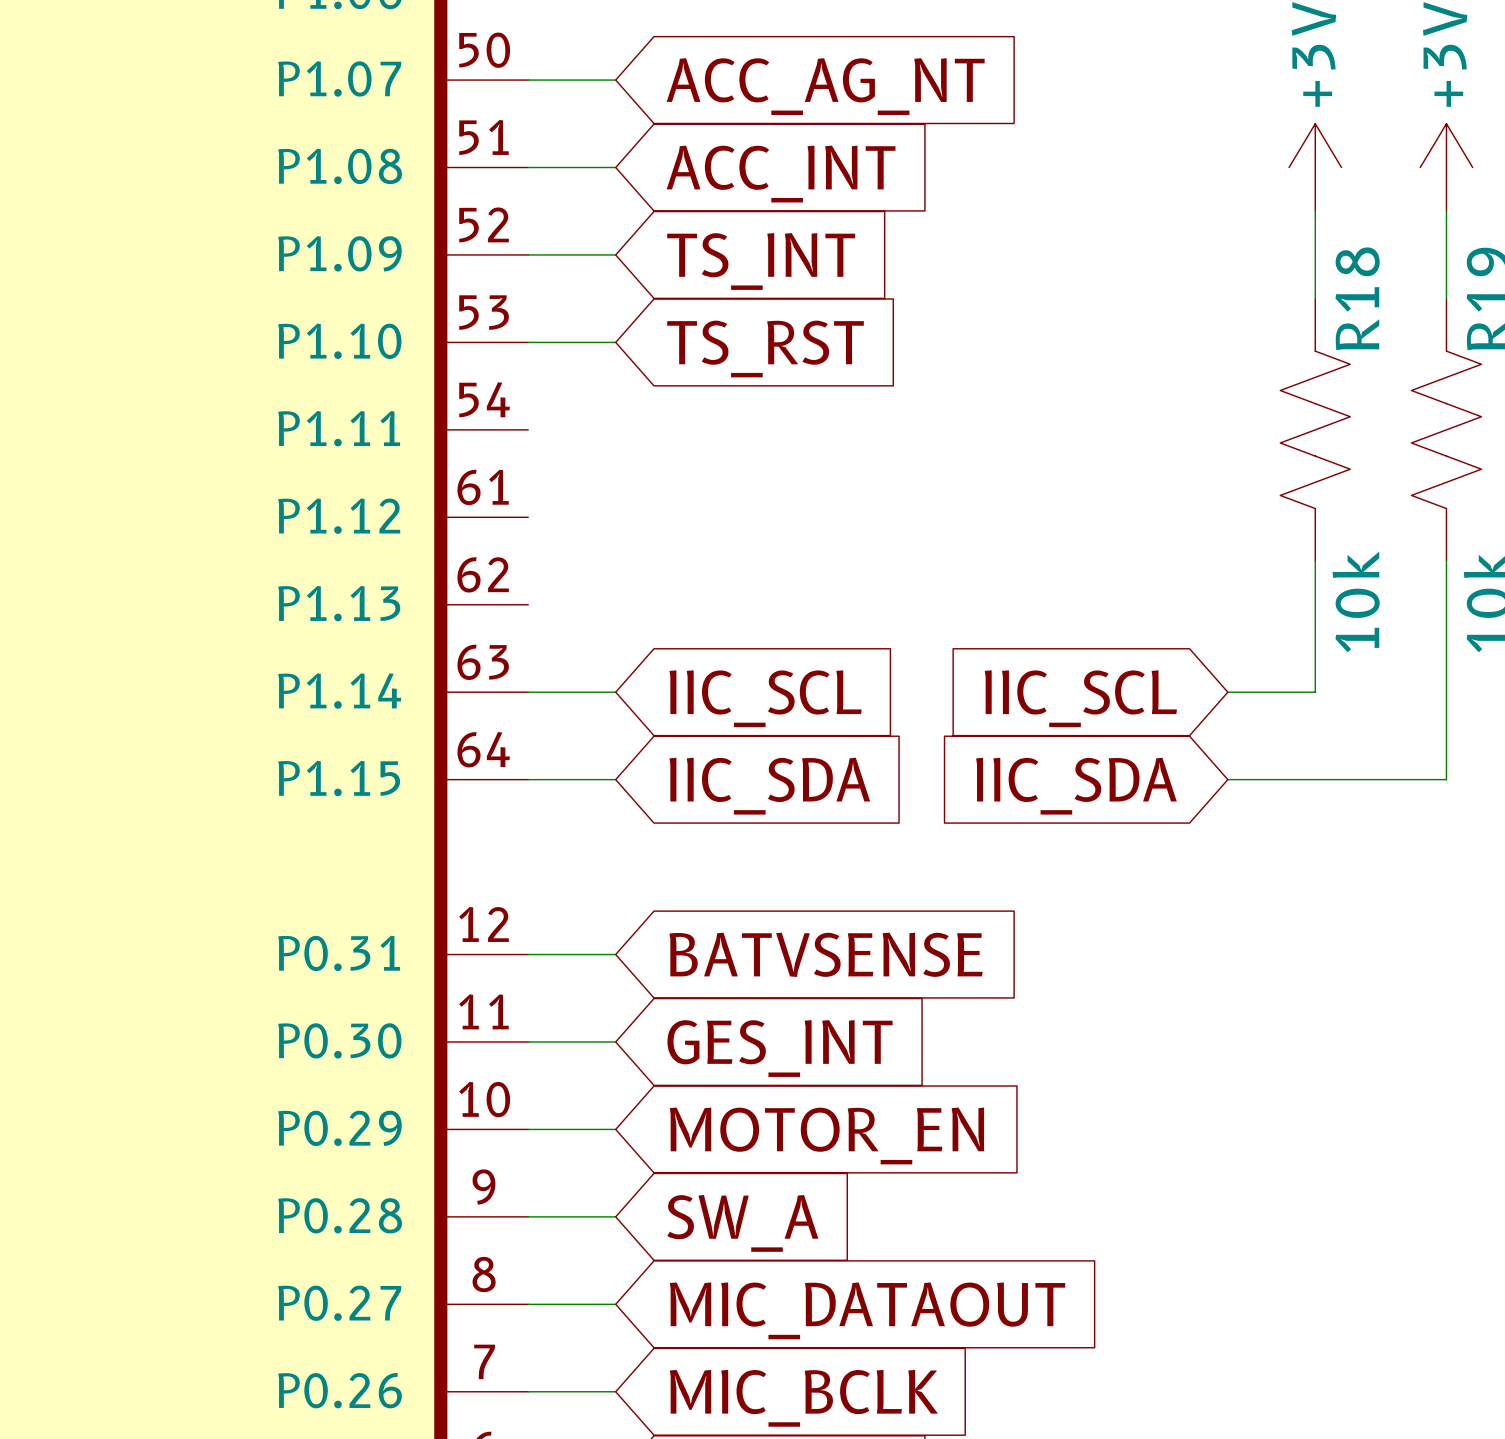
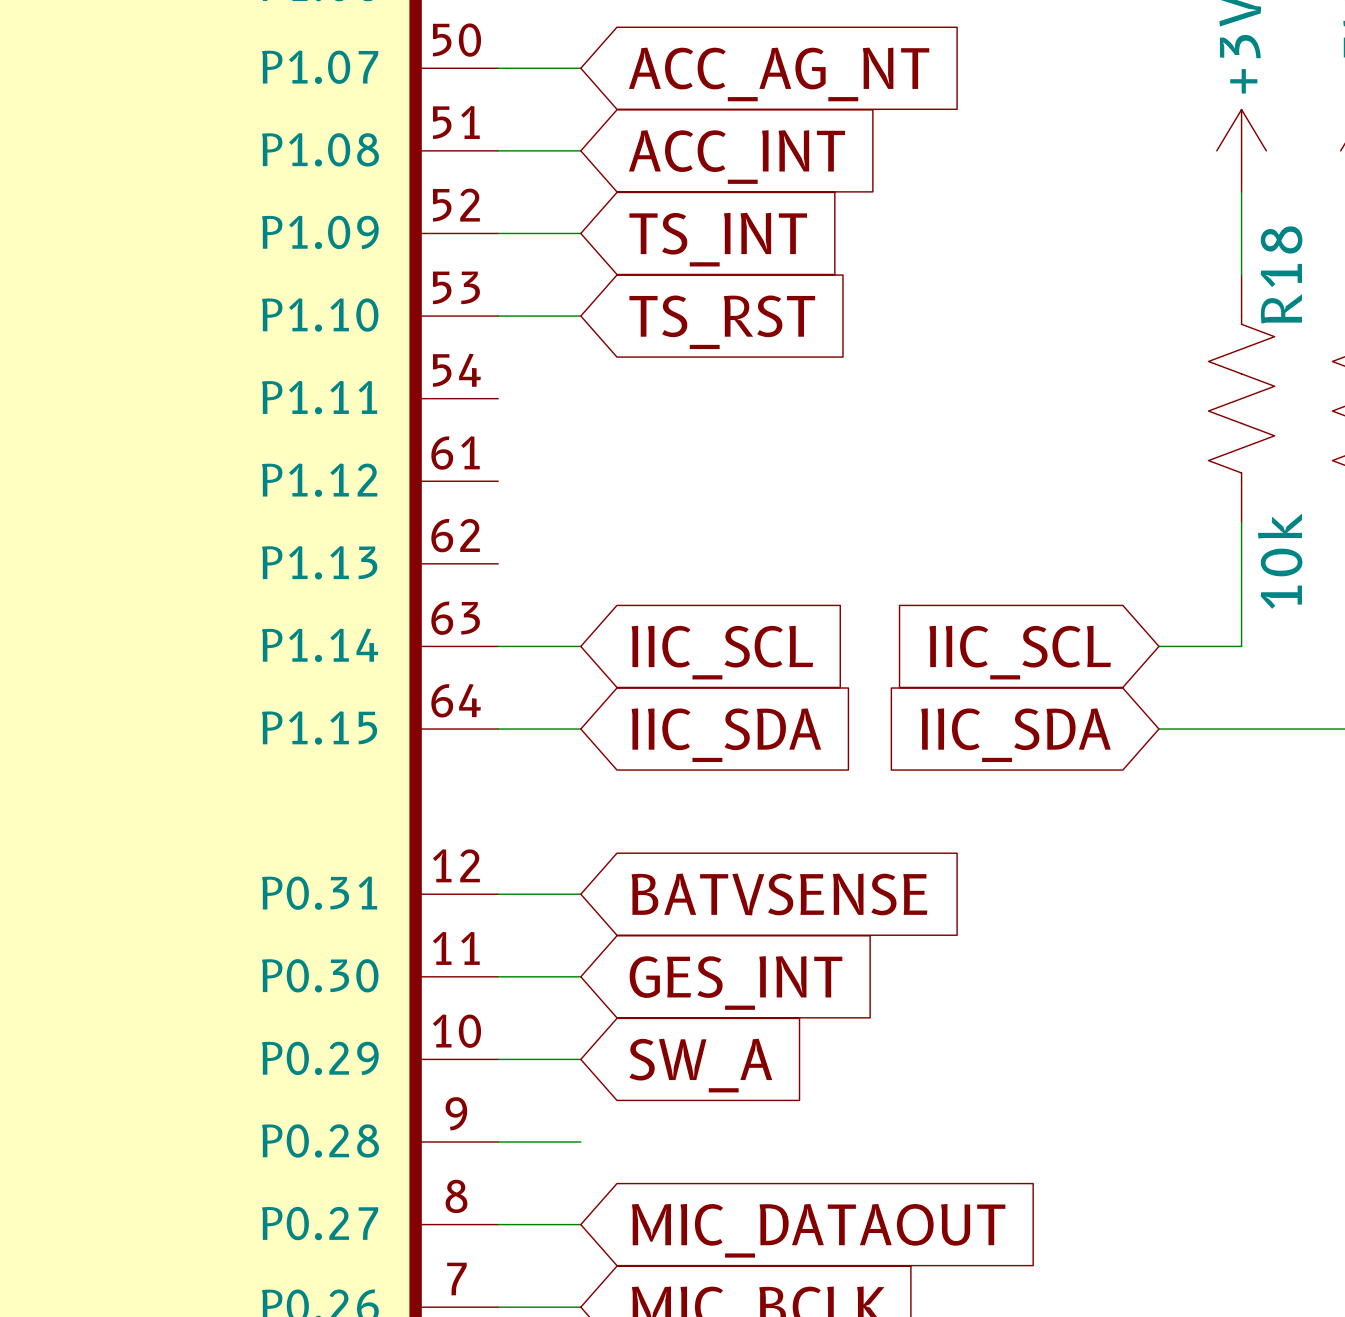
global label: MOTOR_EN (826, 1135) -> SW_A (700, 1065)
global label: SW_A (742, 1223) -> none

